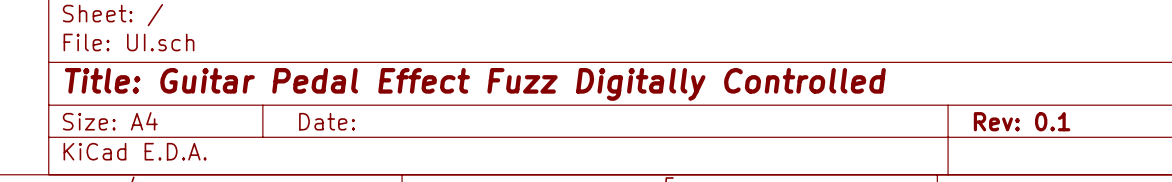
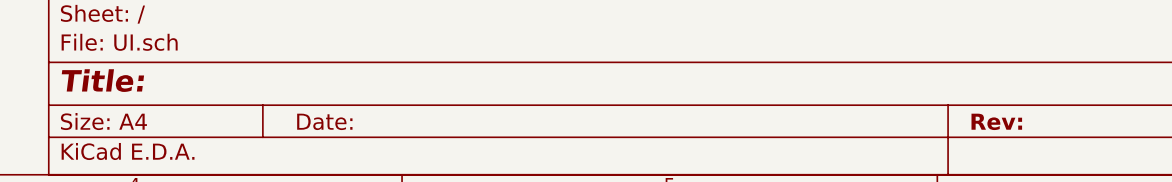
title block: Title: Guitar Pedal Effect Fuzz Digitally Controlled (475, 84) -> Title: (102, 80)
title block: Rev: 0.1 (1022, 121) -> Rev: (996, 121)

